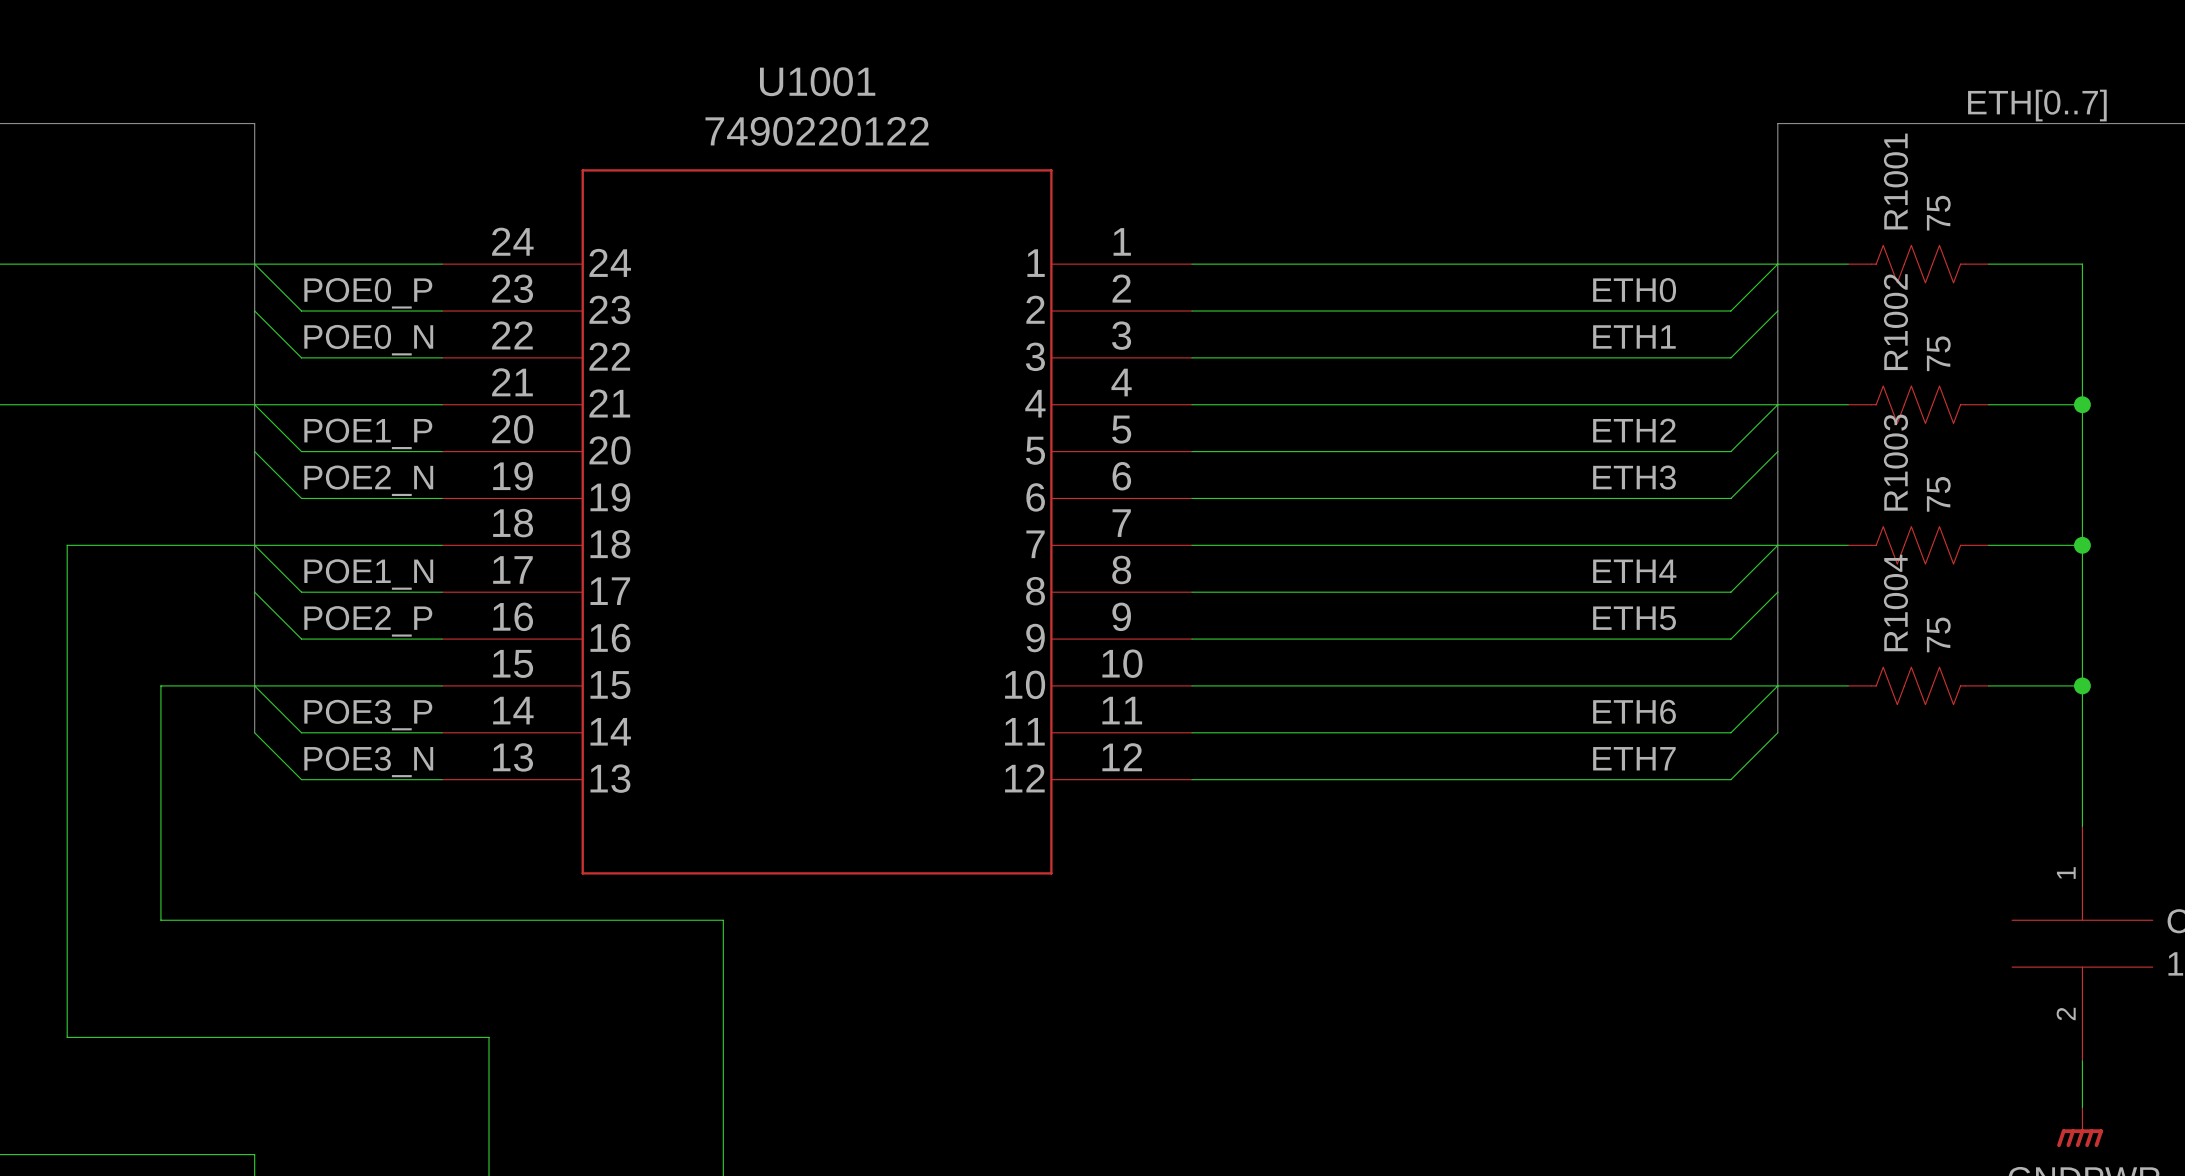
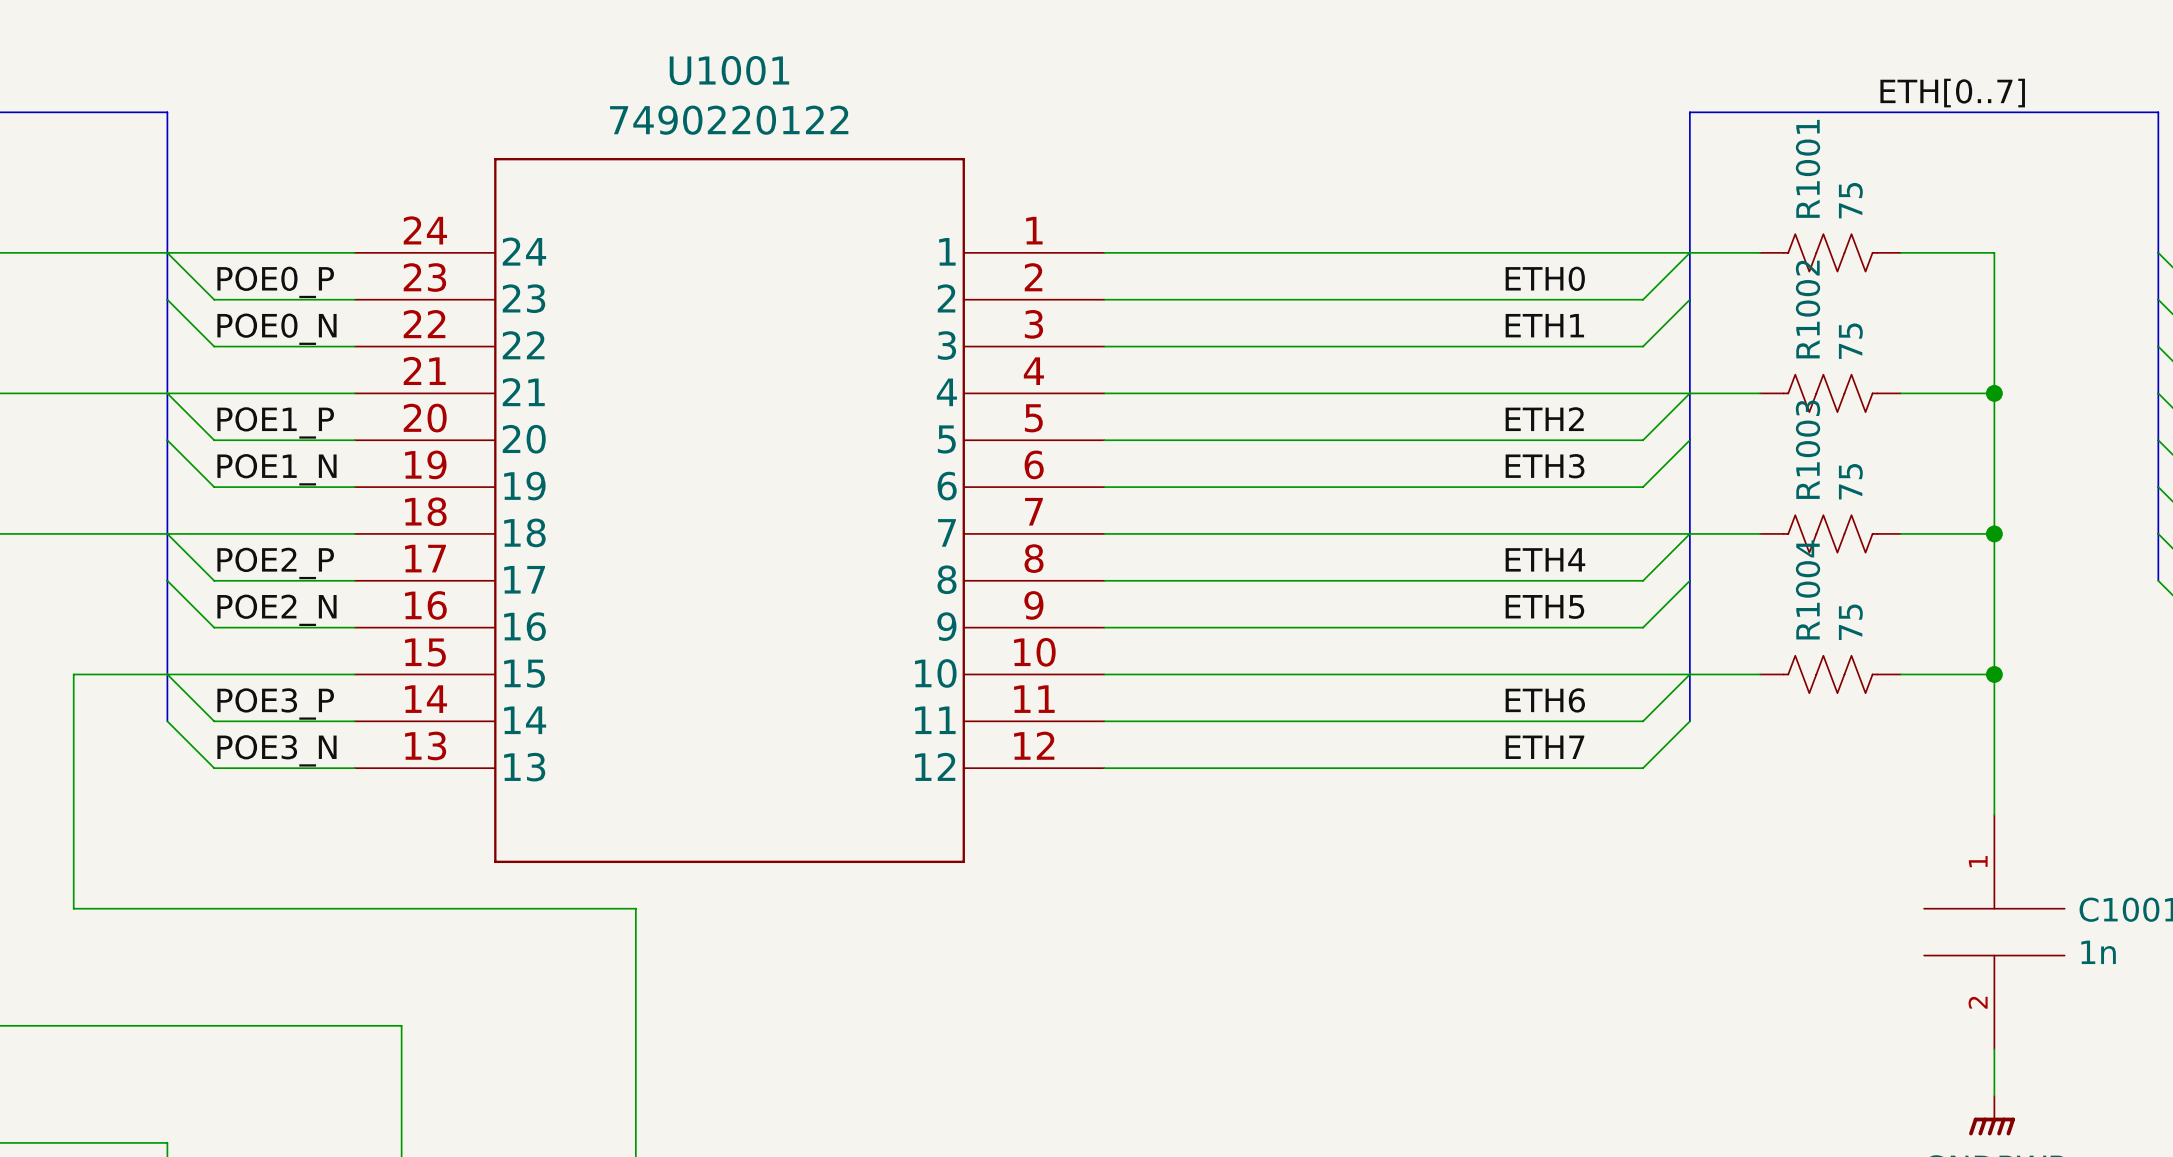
label: POE2_N (368, 480) -> POE1_N (276, 469)
label: POE1_N (368, 574) -> POE2_P (275, 563)
label: POE2_P (368, 621) -> POE2_N (276, 610)

